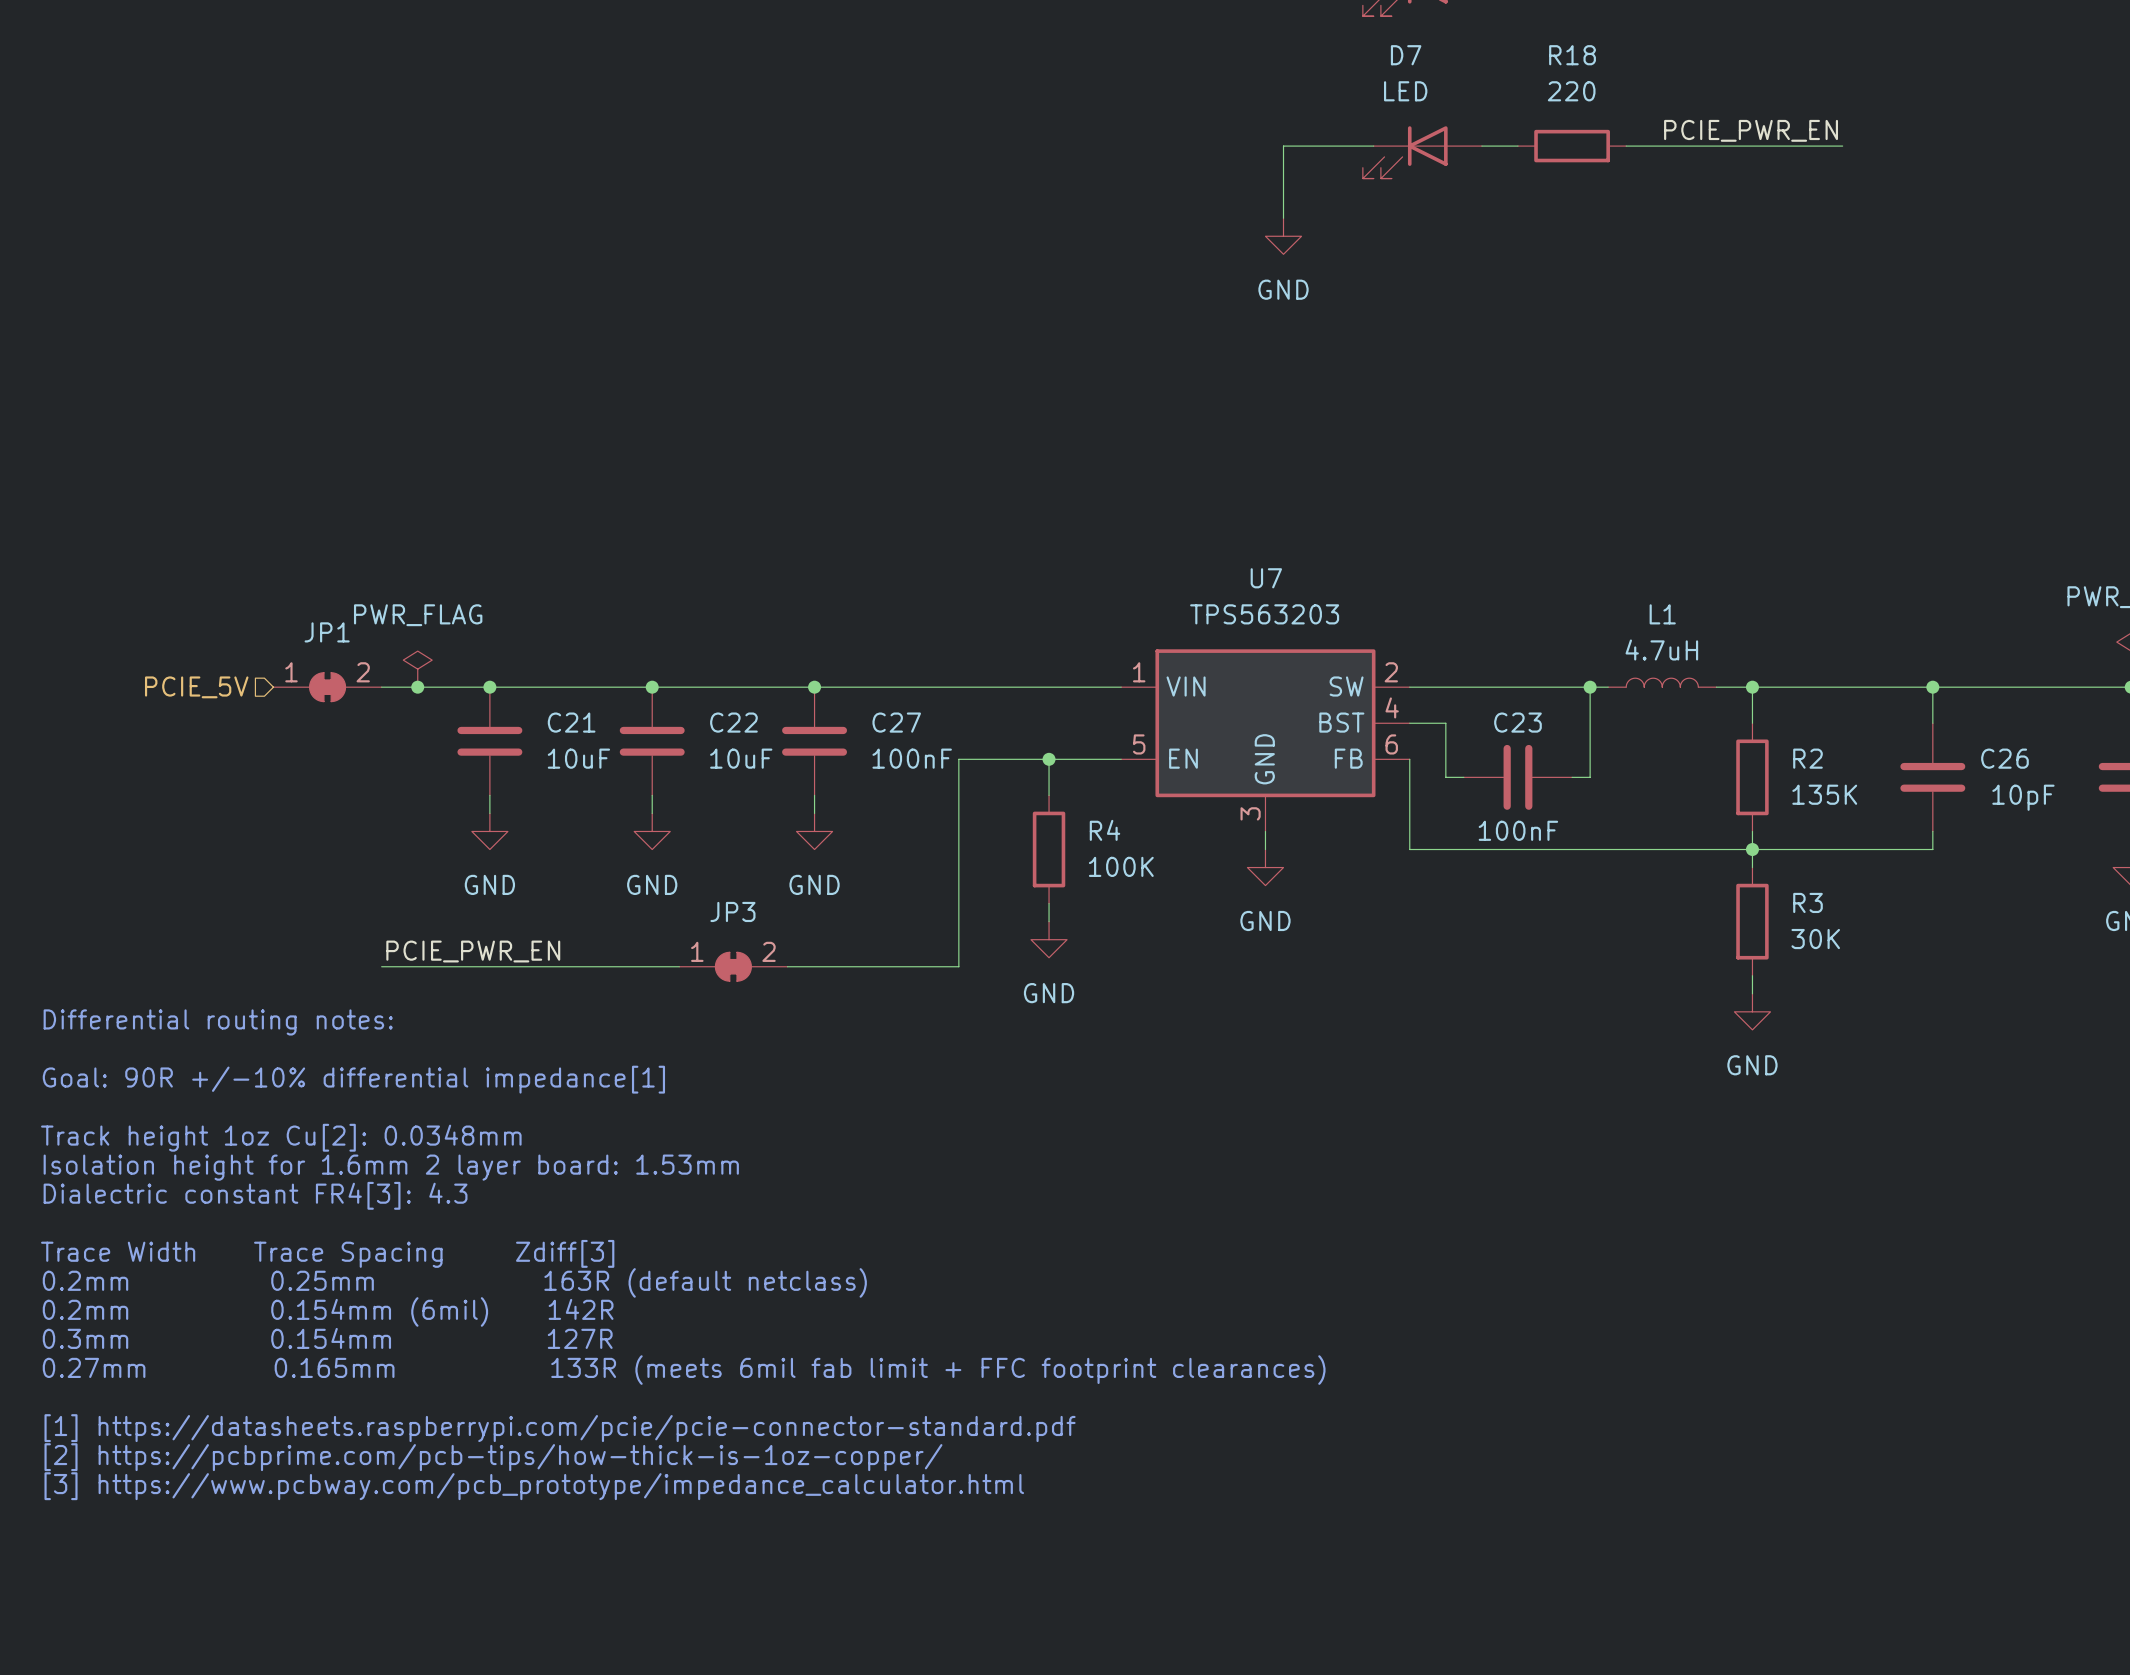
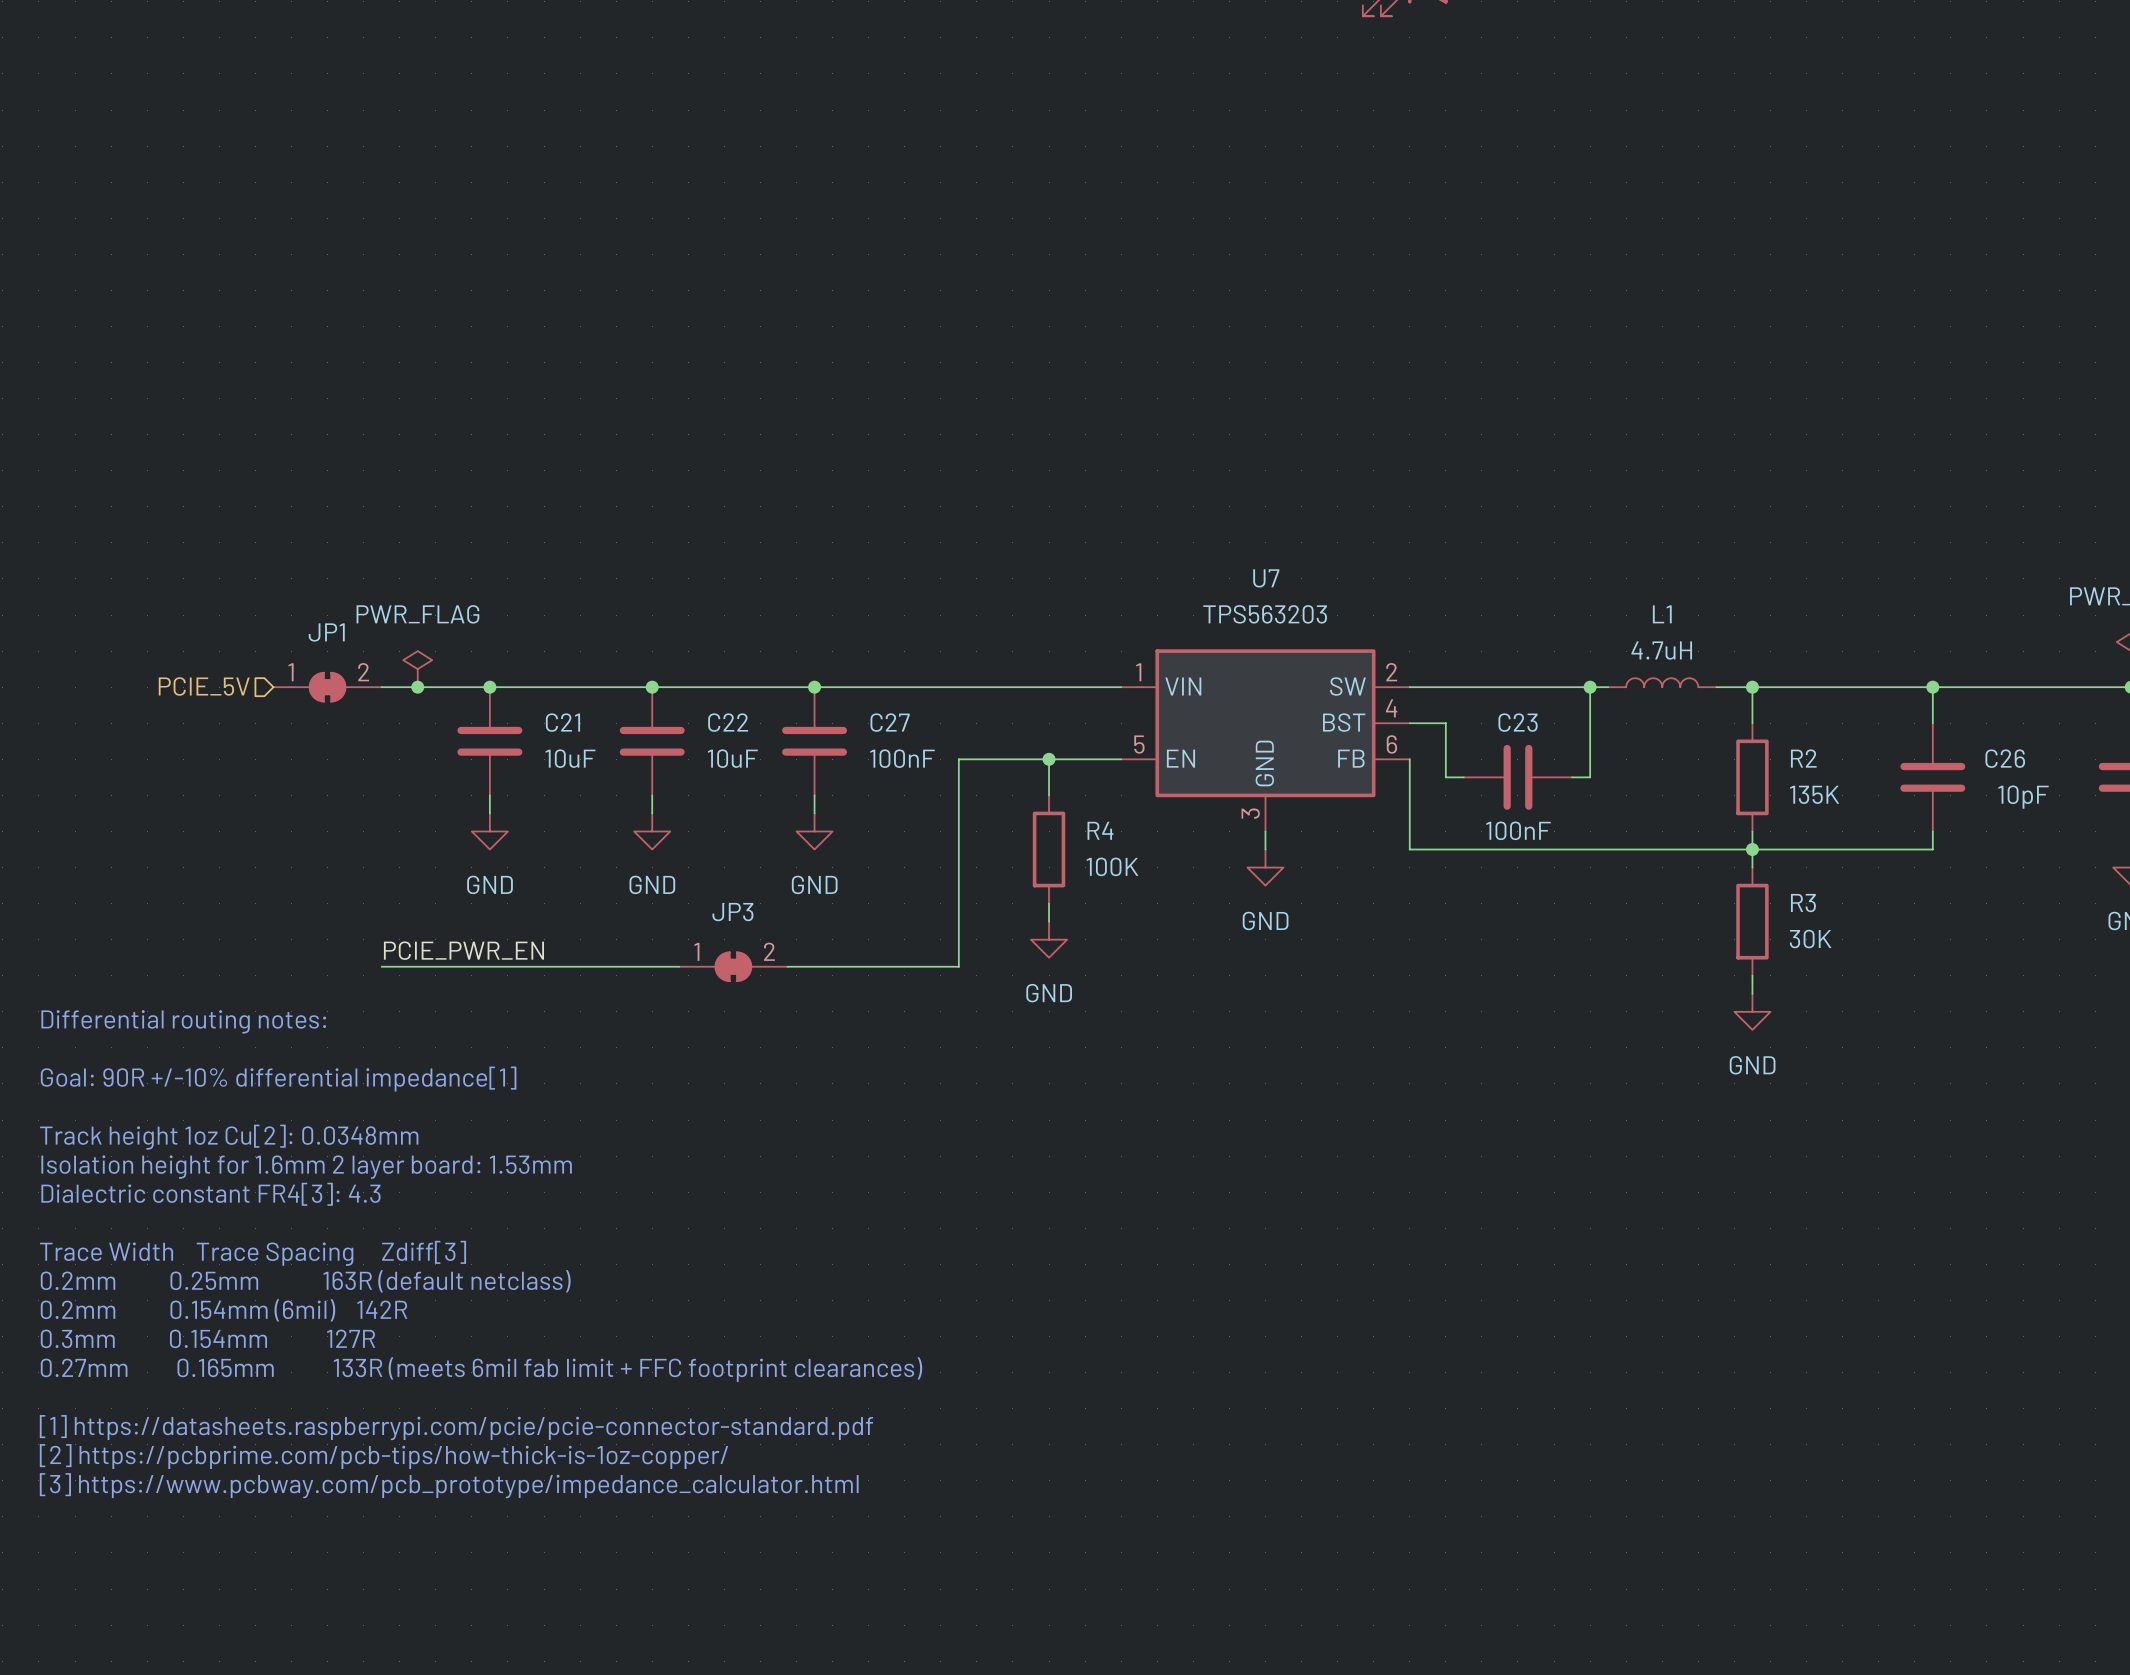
label: PCIE_PWR_EN (1751, 130) -> none
wire: (1373, 146) (1283, 146) (1283, 218) -> none
wire: (1481, 146) (1517, 146) -> none
R18: 220 (1572, 146) -> none
wire: (1626, 146) (1842, 146) -> none
D7: LED (1422, 152) -> none
power symbol: GND (1283, 236) -> none

